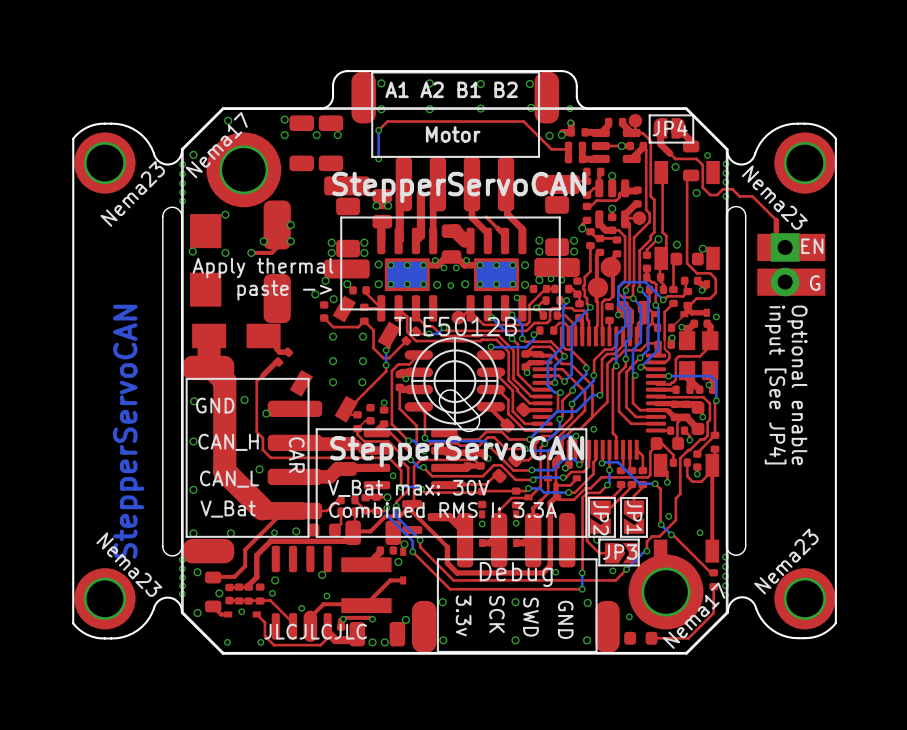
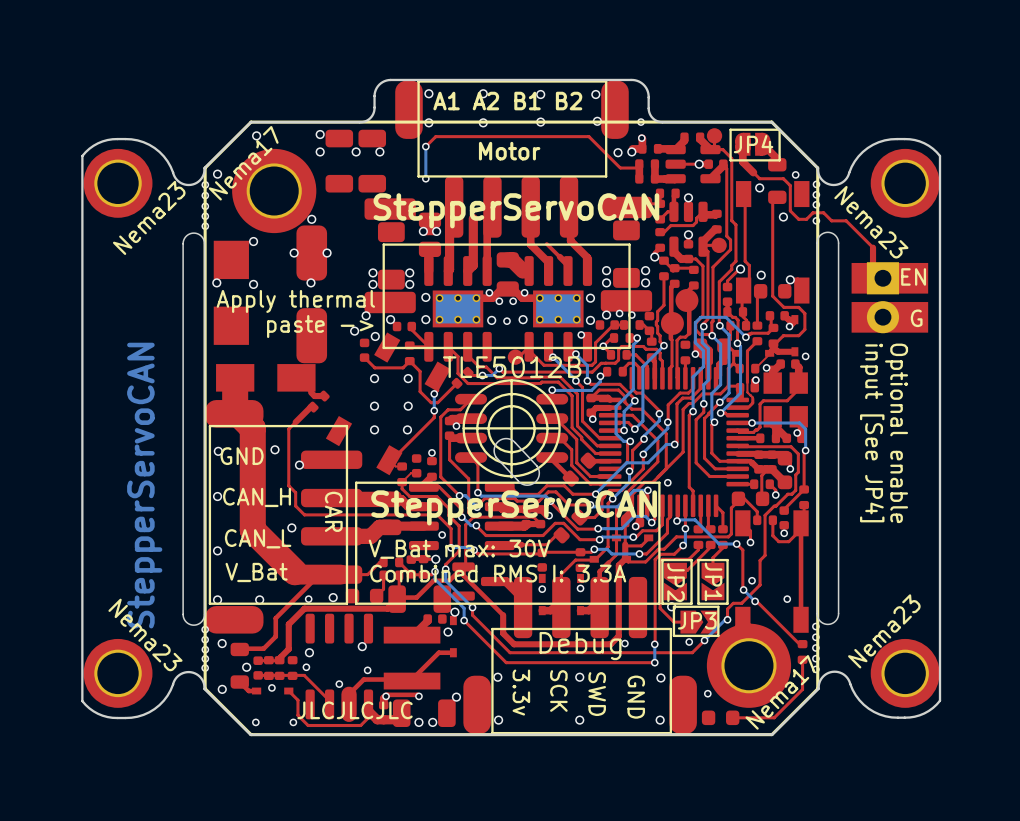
via: none -> (311, 219)
via: none -> (294, 253)
top track: (277, 224) (277, 247) (271, 252) (251, 252) -> none
via: (263, 241) -> none
via: (290, 241) -> none
via: none -> (310, 282)
via: (251, 252) -> none

